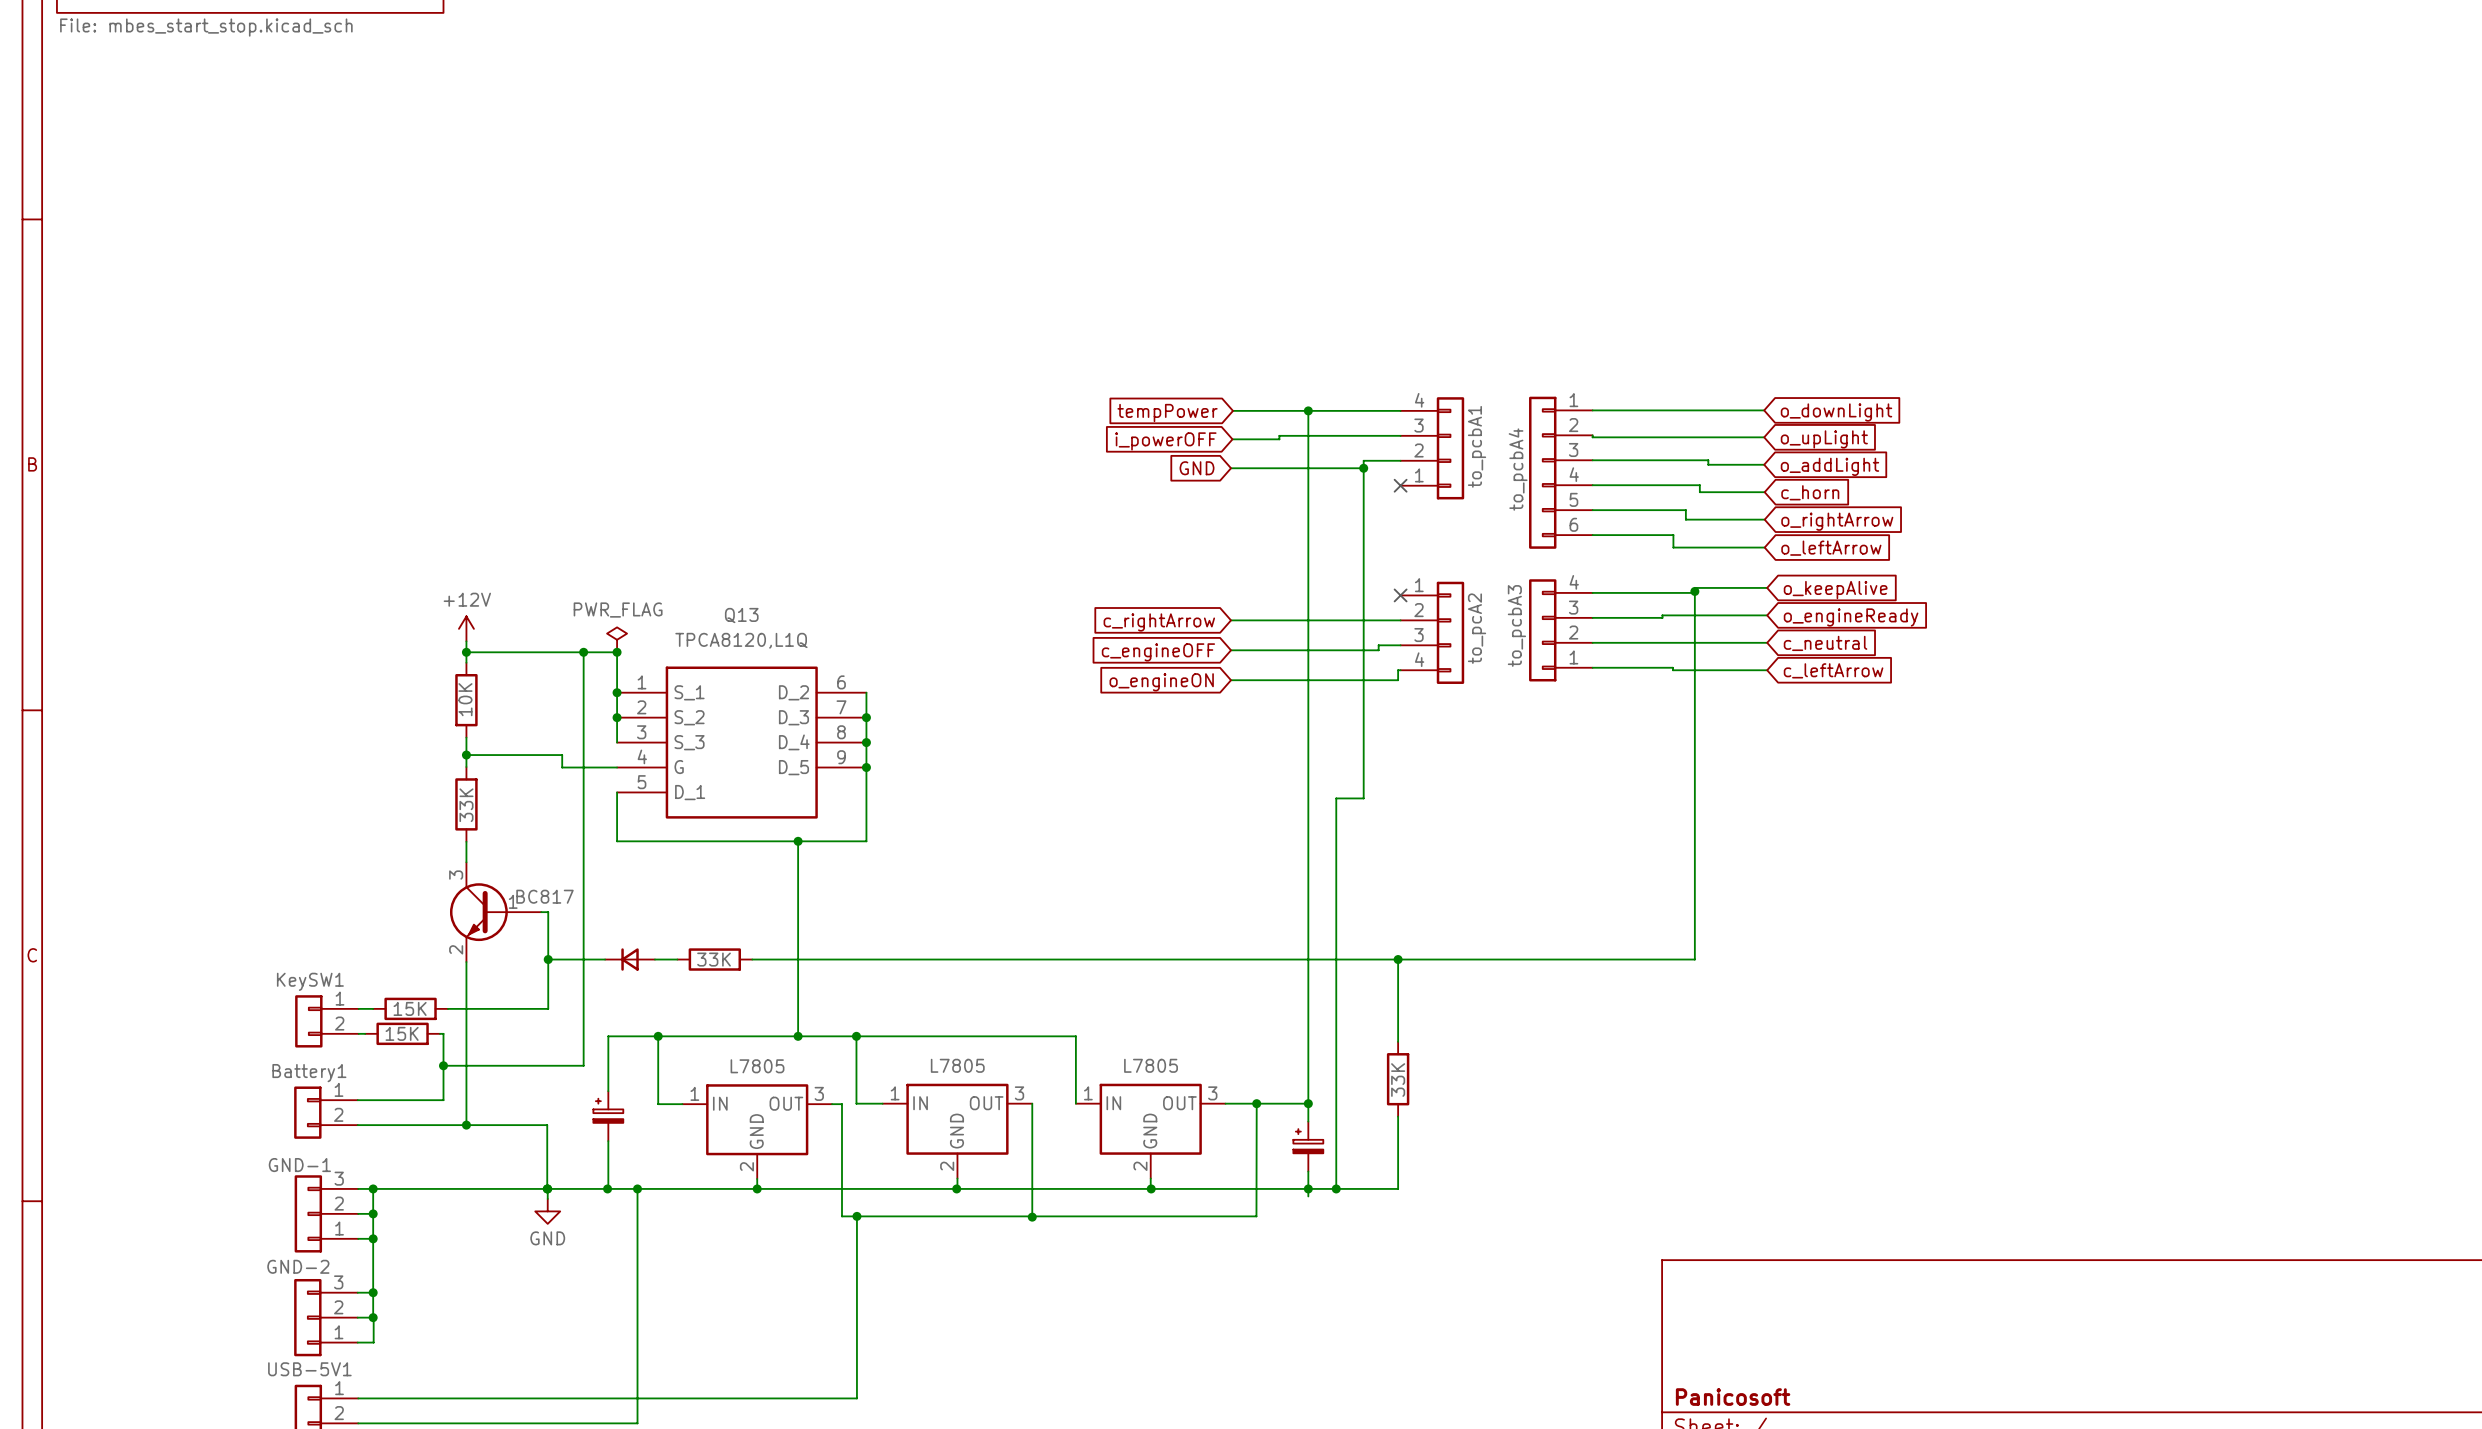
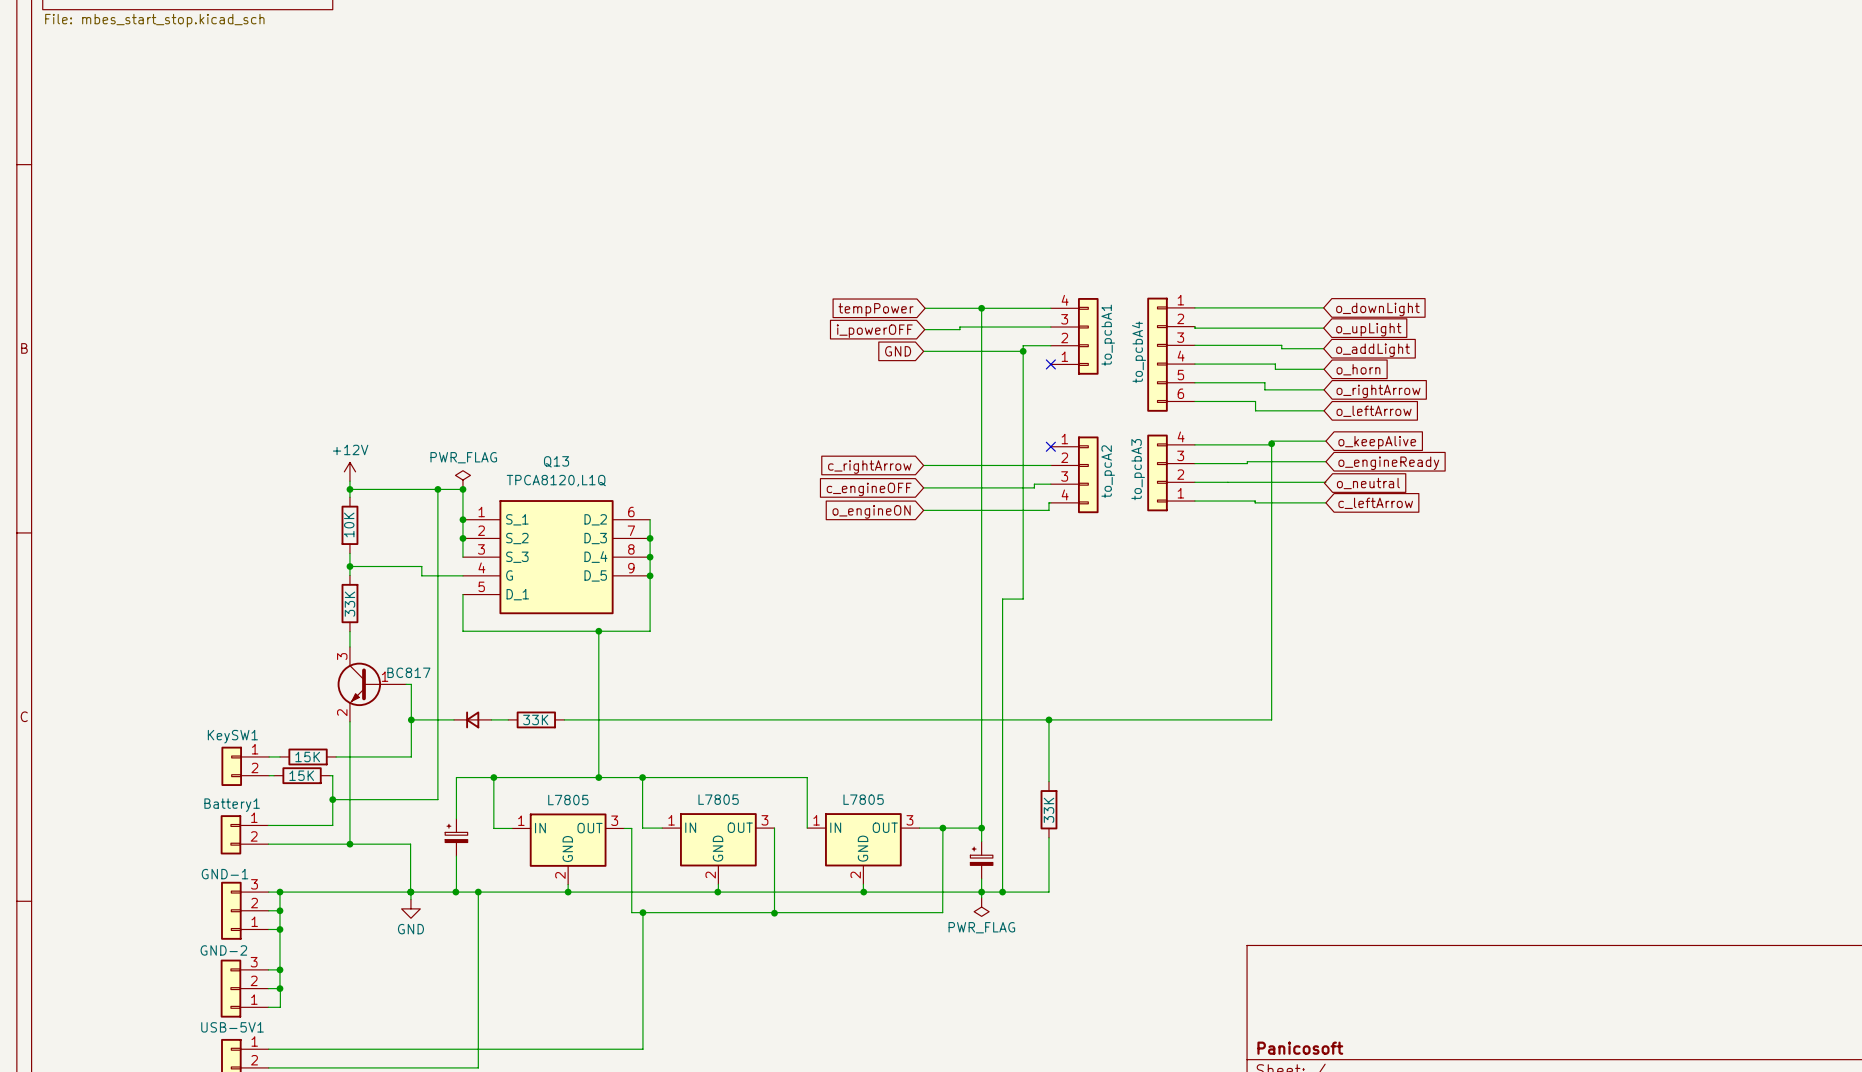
global label: c_horn (1810, 492) -> o_horn (1358, 369)
global label: c_neutral (1825, 643) -> o_neutral (1368, 483)
power symbol: none -> PWR_FLAG (981, 907)

